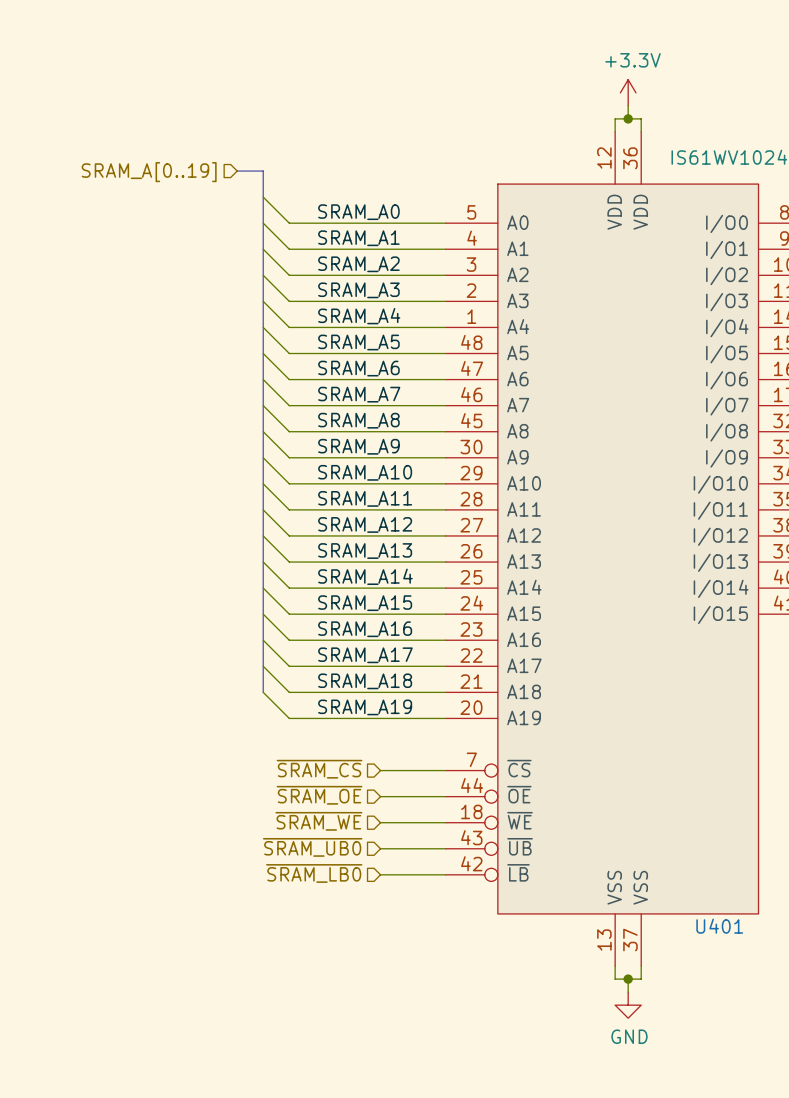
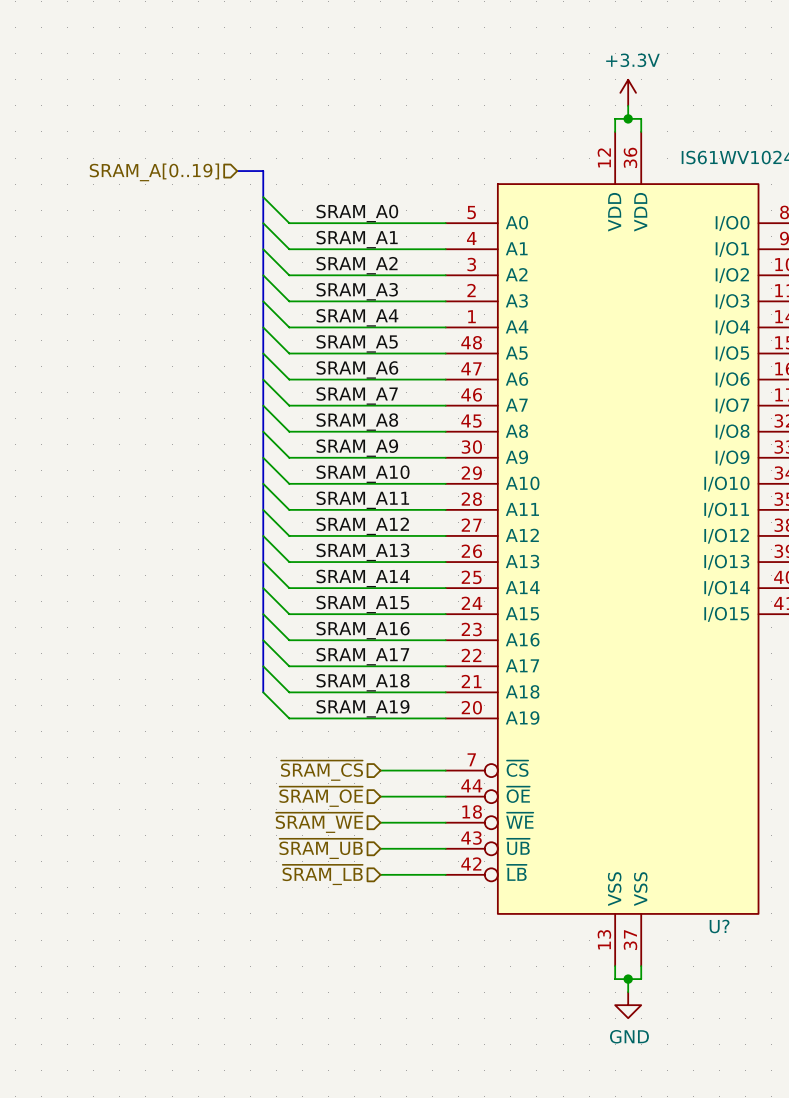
hierarchical label: ~{SRAM_UB0} (312, 847) -> ~{SRAM_UB} (321, 848)
hierarchical label: ~{SRAM_LB0} (314, 873) -> ~{SRAM_LB} (322, 874)
U401 name: U401 (719, 926) -> U? (719, 926)

